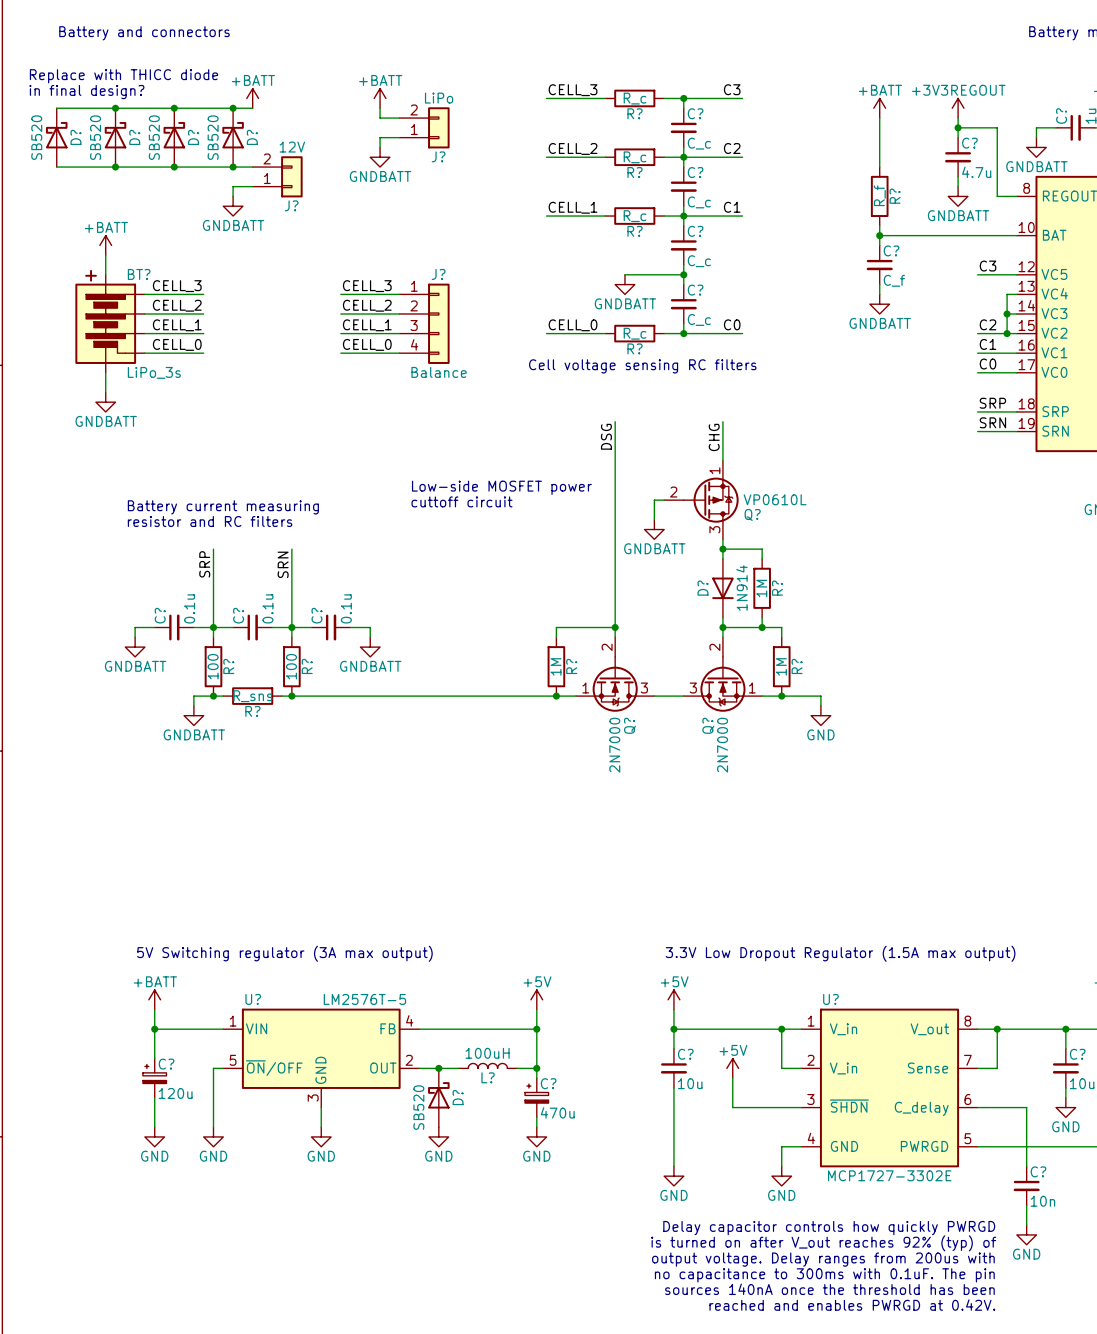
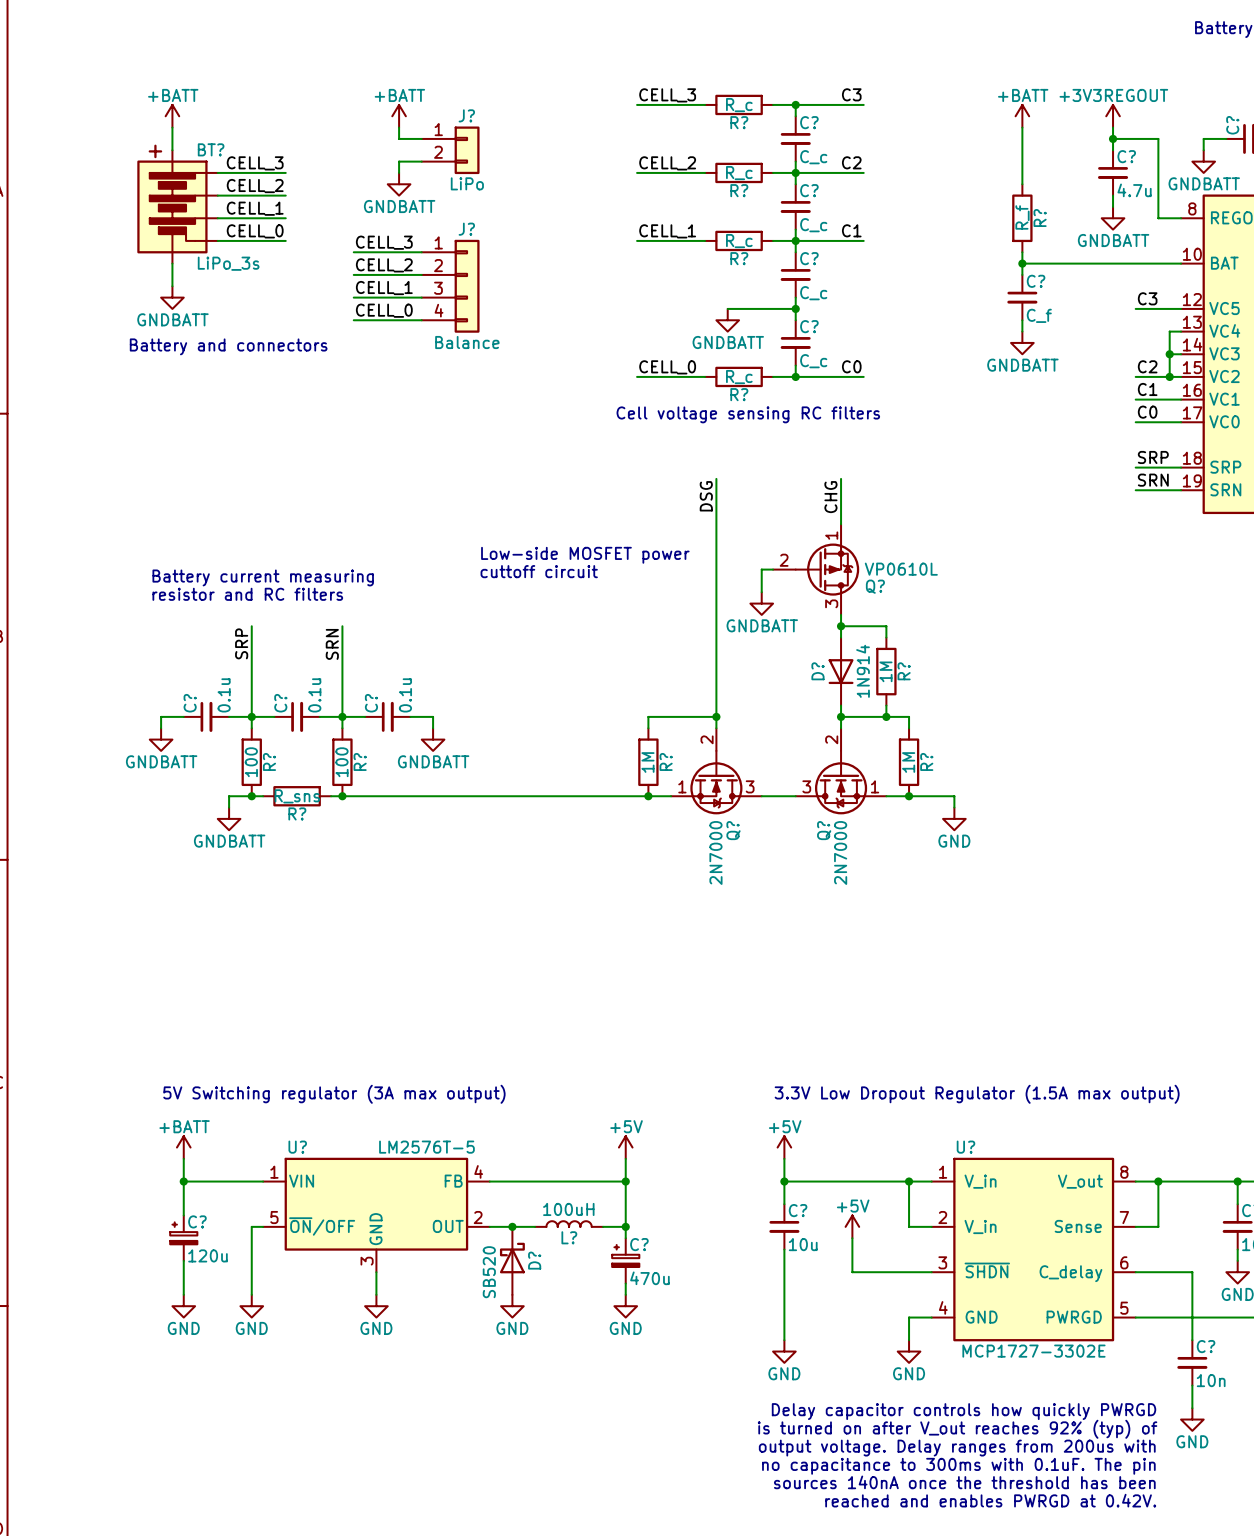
text: Battery and connectors (144, 33) -> none
text: Replace with THICC diode (123, 76) -> none
text: in final design? (86, 92) -> none
power symbol: +BATT (252, 98) -> none
power symbol position: +BATT (380, 98) -> +BATT (399, 116)
wire: (56, 108) (252, 108) -> none
junction: (115, 108) -> none
power symbol: none -> +BATT (172, 116)
junction: (174, 108) -> none
junction: (233, 108) -> none
wire: (380, 108) (380, 118) (399, 118) -> (399, 127) (399, 138) (421, 138)
J?: LiPo (424, 127) -> none
D?: SB520 (56, 137) -> none
D?: SB520 (115, 137) -> none
D?: SB520 (174, 137) -> none
D?: SB520 (233, 137) -> none
J?: none -> LiPo (450, 150)
wire: (399, 137) (380, 137) (380, 147) -> (421, 161) (399, 161) (399, 172)
label: none -> CELL_3 (255, 163)
power symbol position: GNDBATT (380, 157) -> GNDBATT (399, 184)
wire: (56, 167) (252, 167) -> none
junction: (115, 167) -> none
junction: (174, 167) -> none
junction: (233, 167) -> none
label: none -> CELL_2 (255, 186)
J?: 12V (277, 176) -> none
wire: (252, 186) (233, 186) (233, 196) -> none
label: none -> CELL_1 (255, 208)
power symbol: GNDBATT (233, 206) -> none
label: none -> CELL_0 (255, 231)
label: none -> CELL_3 (384, 242)
label: none -> CELL_2 (384, 265)
power symbol: +BATT (105, 245) -> none
wire: (105, 255) (105, 274) -> (172, 127) (172, 150)
label: none -> CELL_1 (384, 288)
power symbol: none -> GNDBATT (172, 297)
label: CELL_3 (177, 286) -> none
label: CELL_3 (367, 286) -> CELL_0 (384, 310)
wire: (144, 294) (203, 294) -> (217, 172) (285, 172)
wire: (340, 294) (399, 294) -> (353, 252) (421, 252)
label: CELL_2 (177, 305) -> none
label: CELL_2 (367, 305) -> none
text: none -> Battery and connectors (228, 346)
wire: (144, 313) (203, 313) -> (217, 195) (285, 195)
wire: (340, 313) (399, 313) -> (353, 274) (421, 274)
BT? position: (110, 321) -> (177, 204)
J? position: (424, 323) -> (450, 286)
label: CELL_1 (177, 325) -> none
label: CELL_1 (367, 325) -> none
wire: (144, 333) (203, 333) -> (217, 218) (285, 218)
wire: (340, 333) (399, 333) -> (353, 297) (421, 297)
label: CELL_0 (177, 344) -> none
label: CELL_0 (367, 344) -> none
wire: (144, 353) (203, 353) -> (217, 240) (285, 240)
wire: (340, 353) (399, 353) -> (353, 320) (421, 320)
wire: (105, 372) (105, 392) -> (172, 263) (172, 286)
power symbol: GNDBATT (105, 402) -> none

